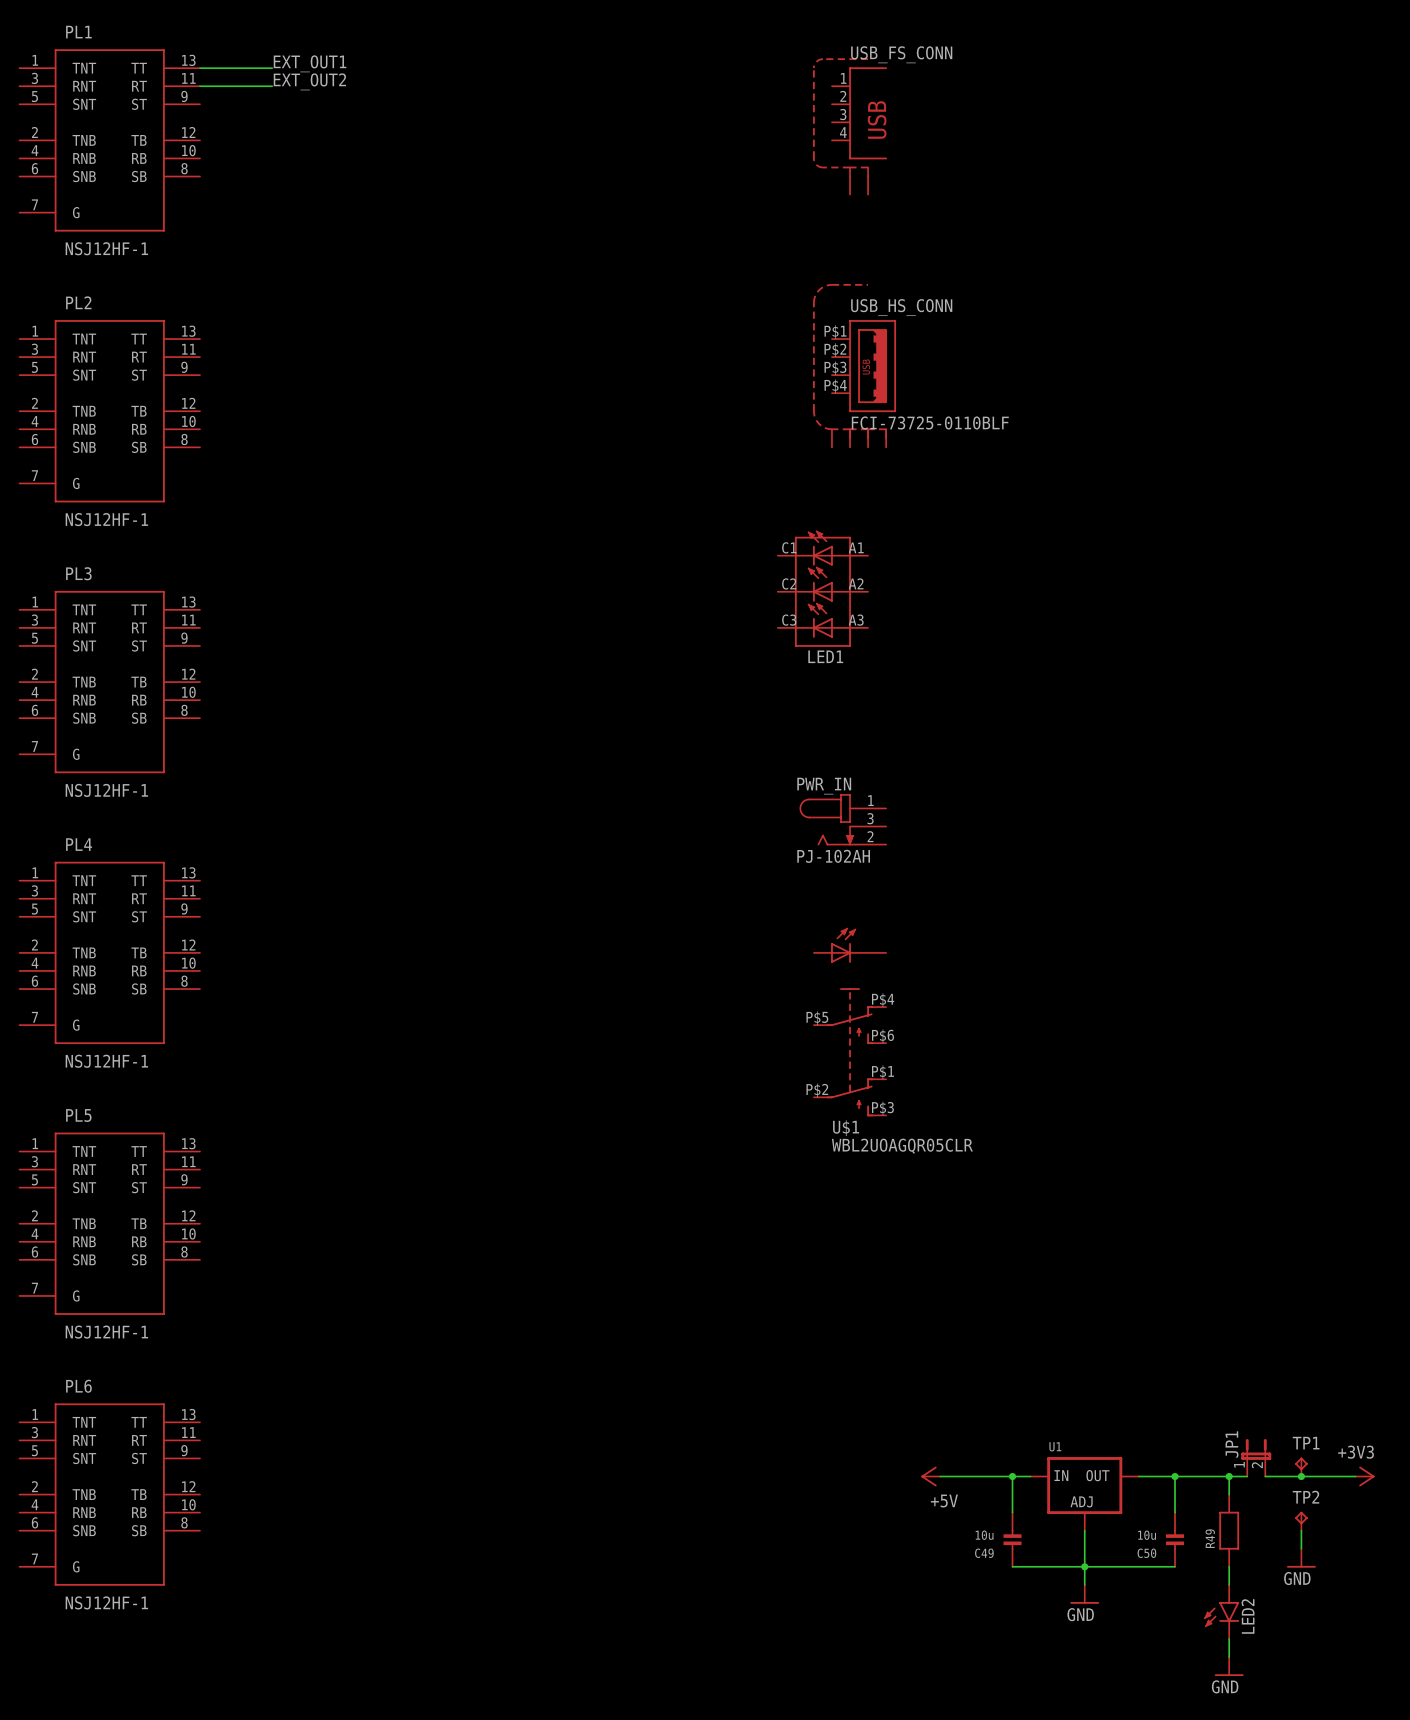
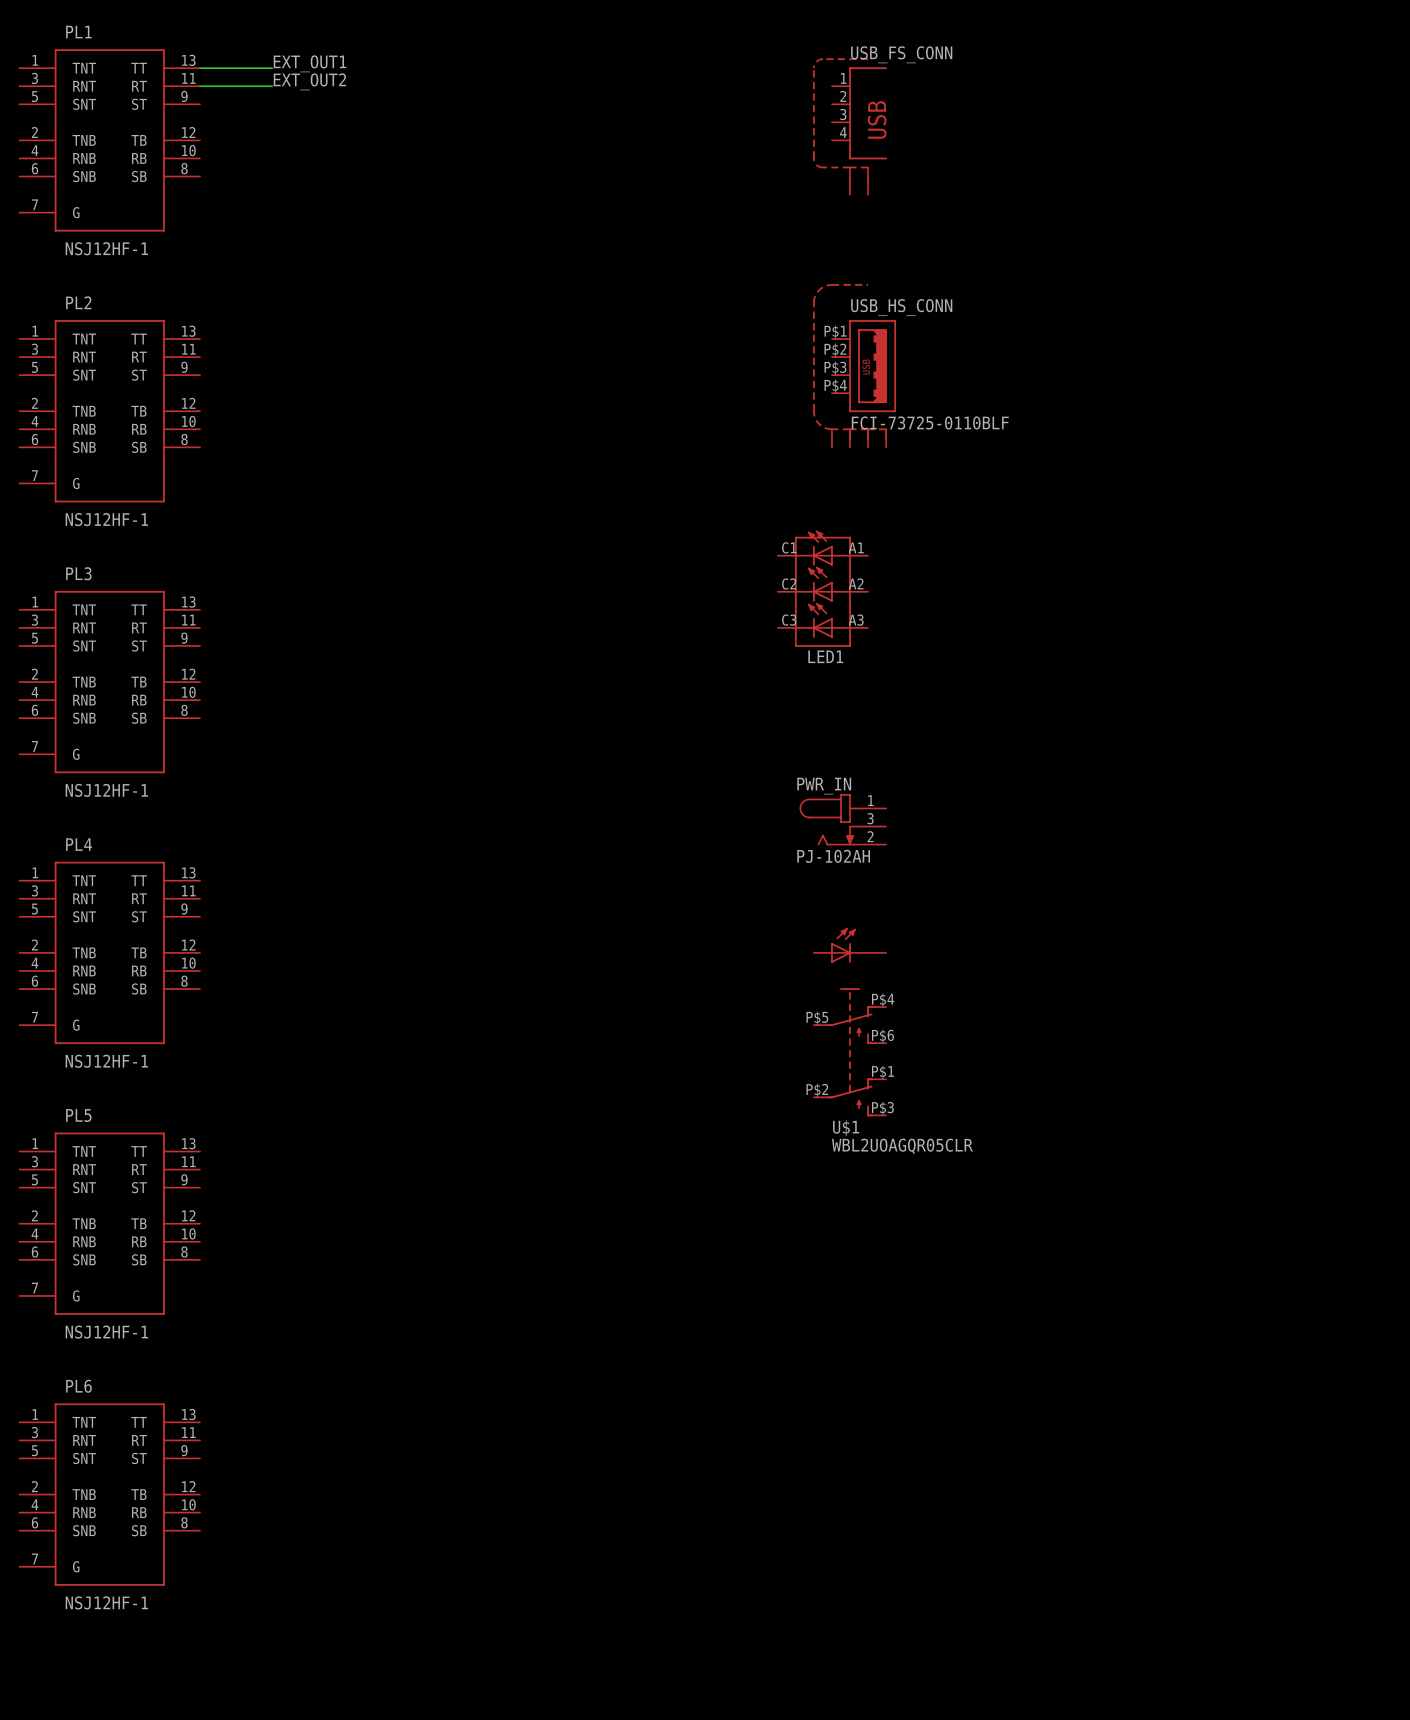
JP1: (1256, 1457) -> none
TP1: (1301, 1467) -> none
power symbol: +5V (930, 1476) -> none
wire: (940, 1476) (1030, 1476) -> none
wire: (1012, 1476) (1012, 1512) -> none
junction: (1012, 1476) -> none
wire: (1138, 1476) (1247, 1476) -> none
wire: (1175, 1476) (1175, 1512) -> none
junction: (1175, 1476) -> none
wire: (1229, 1476) (1229, 1494) -> none
junction: (1229, 1476) -> none
wire: (1265, 1476) (1355, 1476) -> none
junction: (1301, 1476) -> none
power symbol: +3V3 (1365, 1476) -> none
U1: (1084, 1493) -> none
TP2: (1301, 1521) -> none
wire: (1084, 1530) (1084, 1584) -> none
R49: (1229, 1530) -> none
wire: (1301, 1530) (1301, 1548) -> none
C49: 10u (1012, 1539) -> none
C50: 10u (1175, 1539) -> none
power symbol: GND (1301, 1558) -> none
wire: (1012, 1566) (1175, 1566) -> none
junction: (1084, 1566) -> none
wire: (1229, 1566) (1229, 1584) -> none
power symbol: GND (1084, 1594) -> none
LED2: (1221, 1611) -> none
wire: (1229, 1639) (1229, 1657) -> none
power symbol: GND (1229, 1666) -> none

